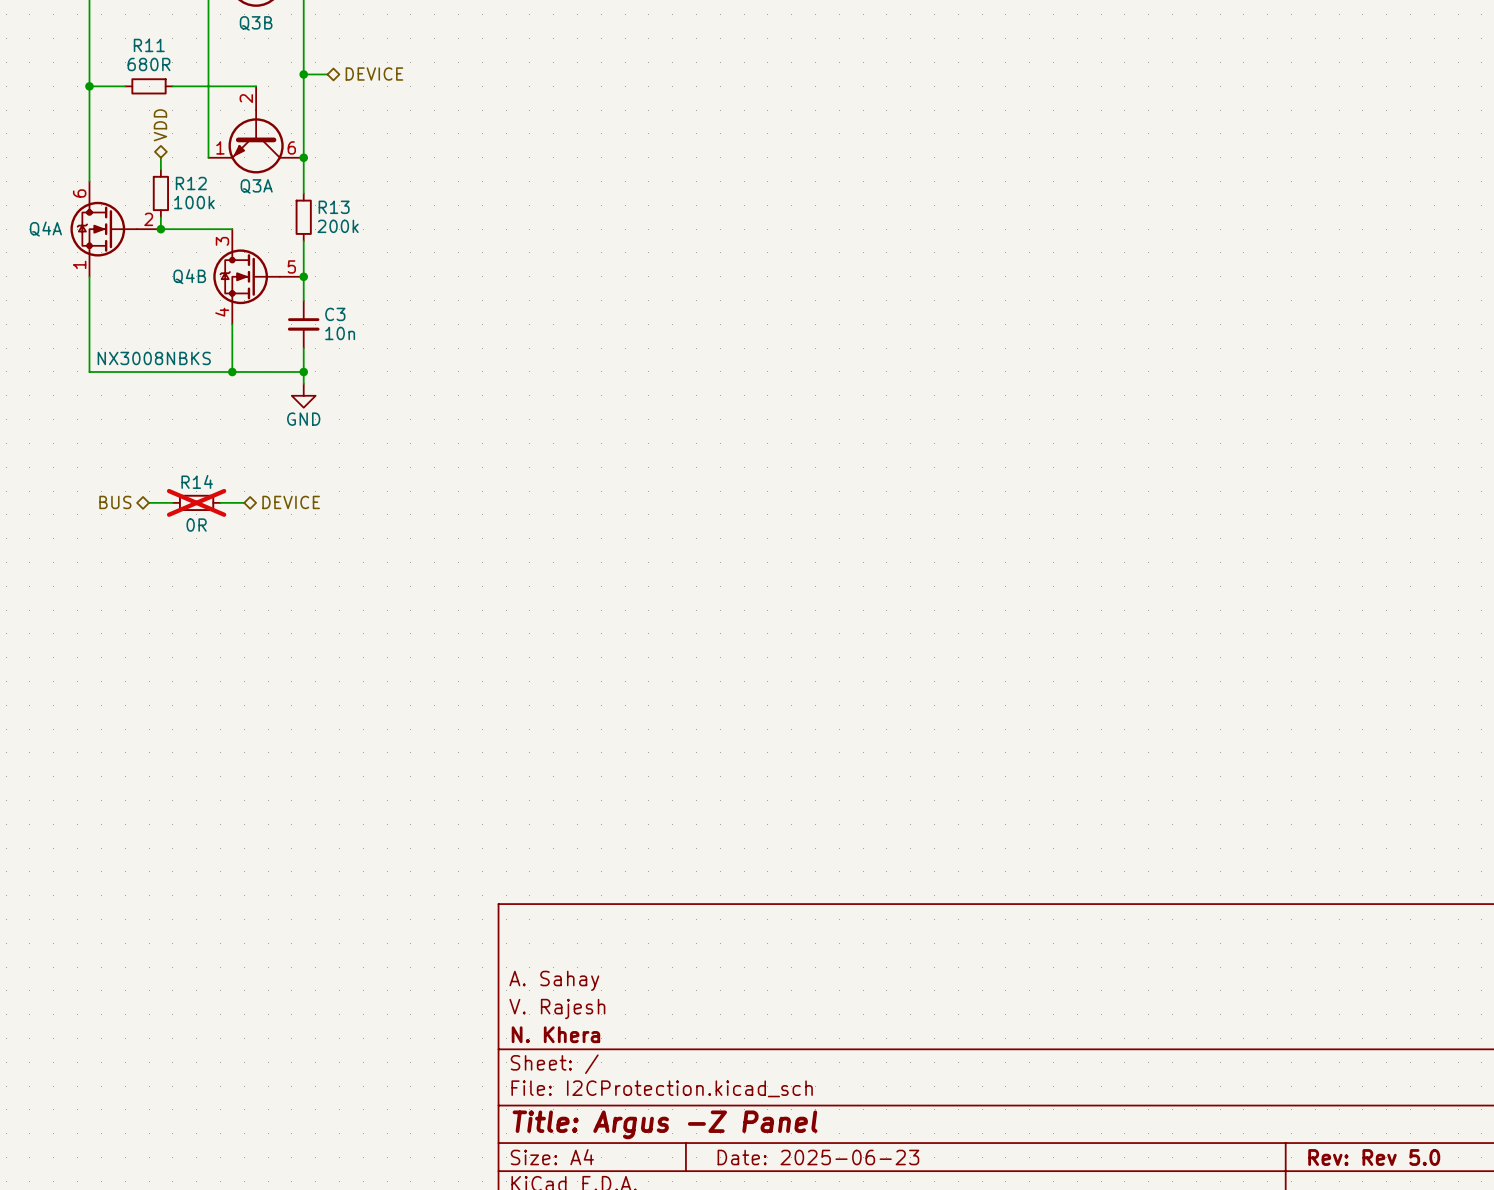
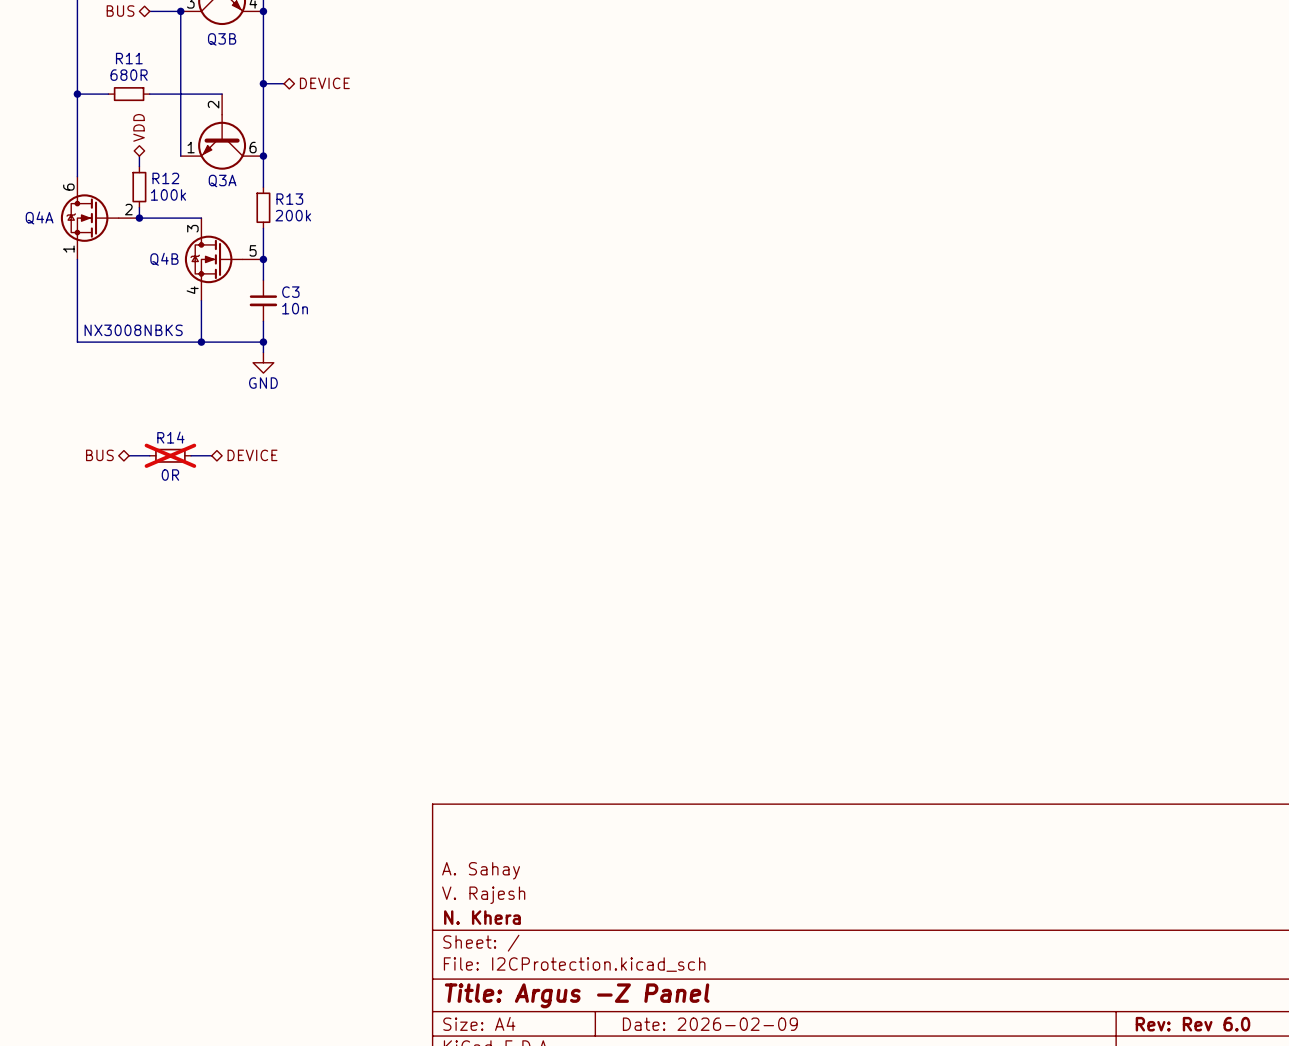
title block: Date: 2025-06-23 (818, 1157) -> Date: 2026-02-09 (710, 1024)
title block: Rev: Rev 5.0 (1374, 1157) -> Rev: Rev 6.0 (1193, 1024)

